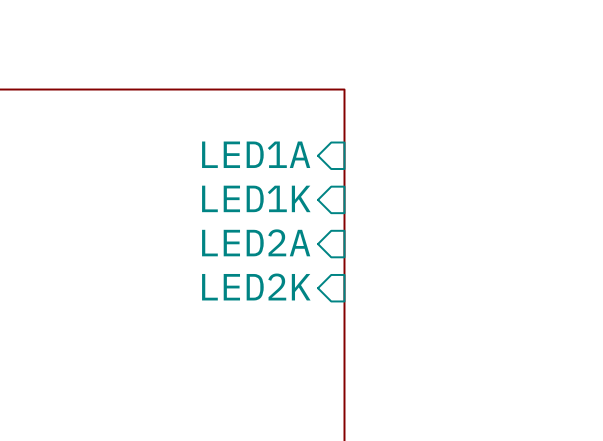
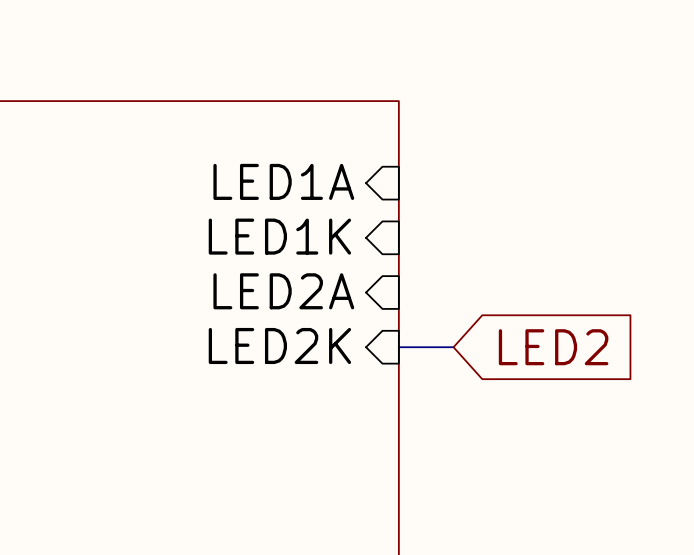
global label: none -> LED2 (553, 347)
wire: none -> (398, 347) (453, 347)

